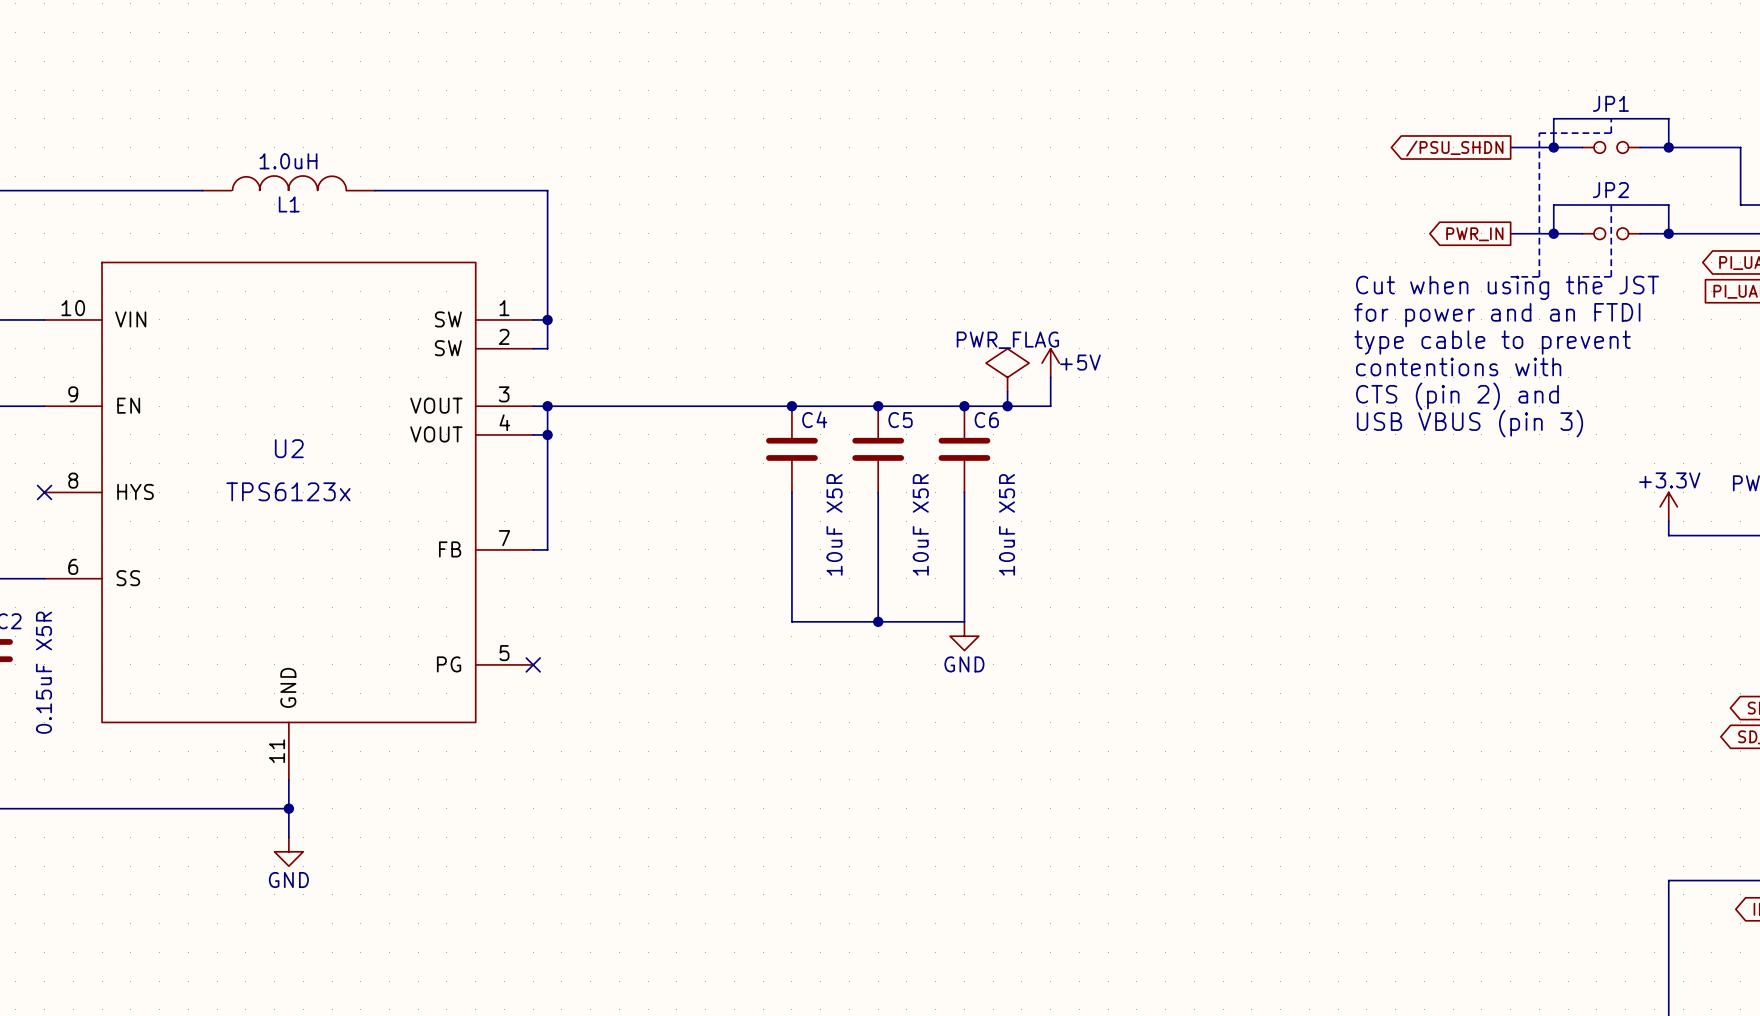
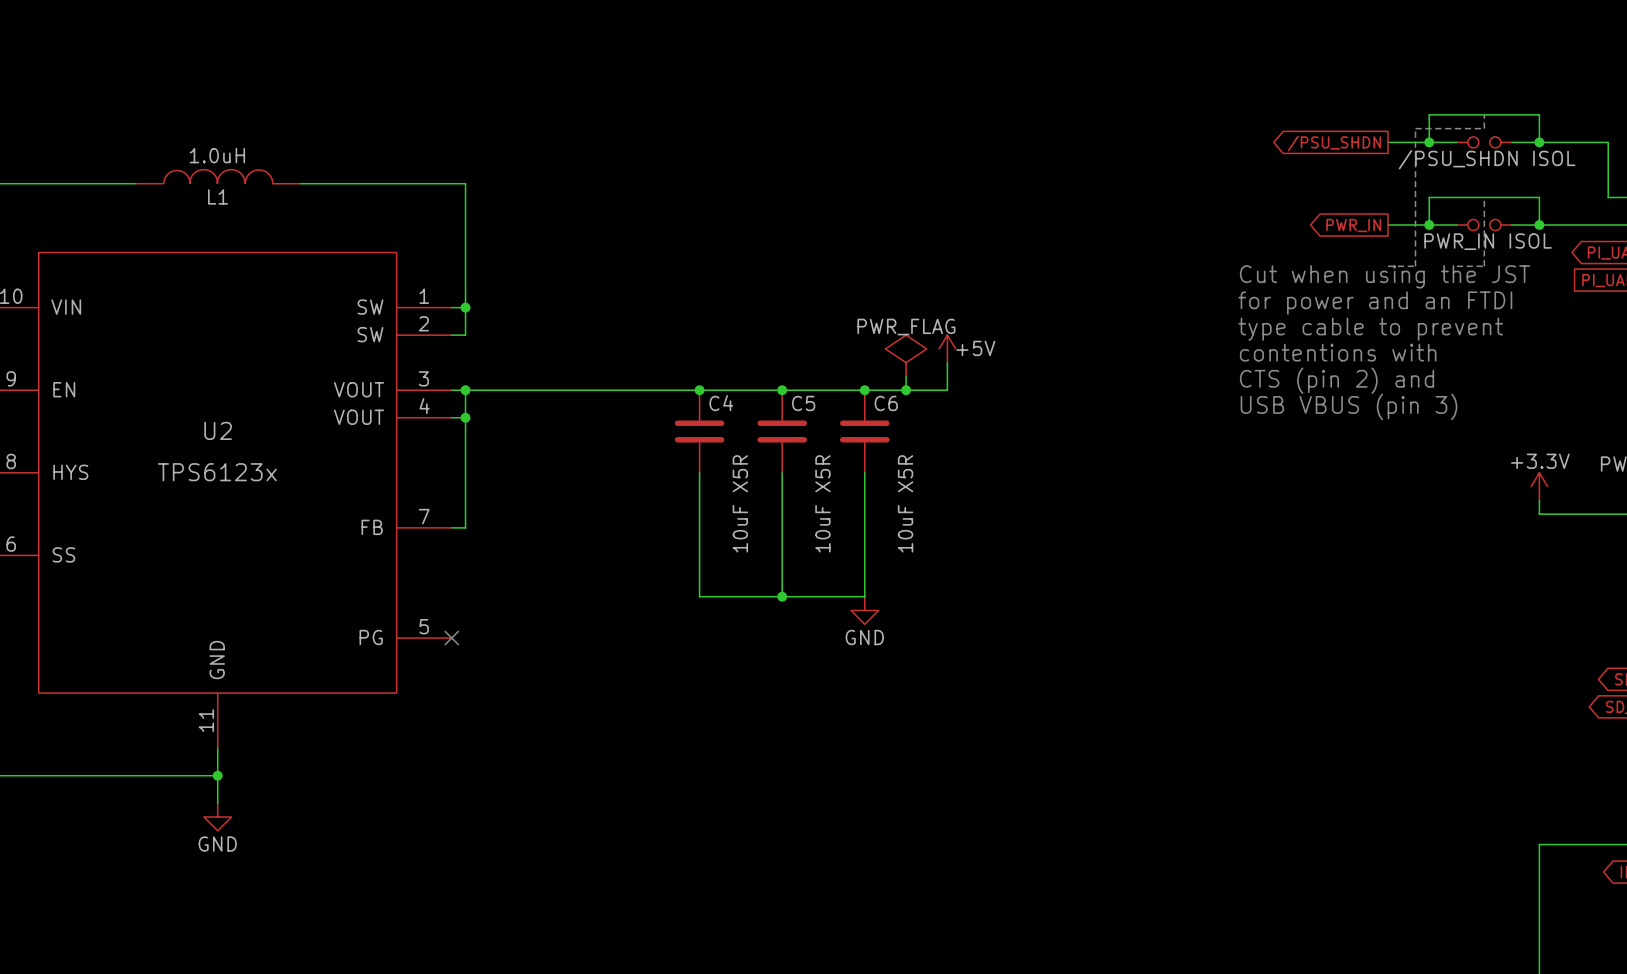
JP1 name: JP1 (1610, 103) -> none
JP1 value: none -> /PSU_SHDN ISOL (1487, 159)
JP2 name: JP2 (1610, 190) -> none
JP2 value: none -> PWR_IN ISOL (1488, 241)

